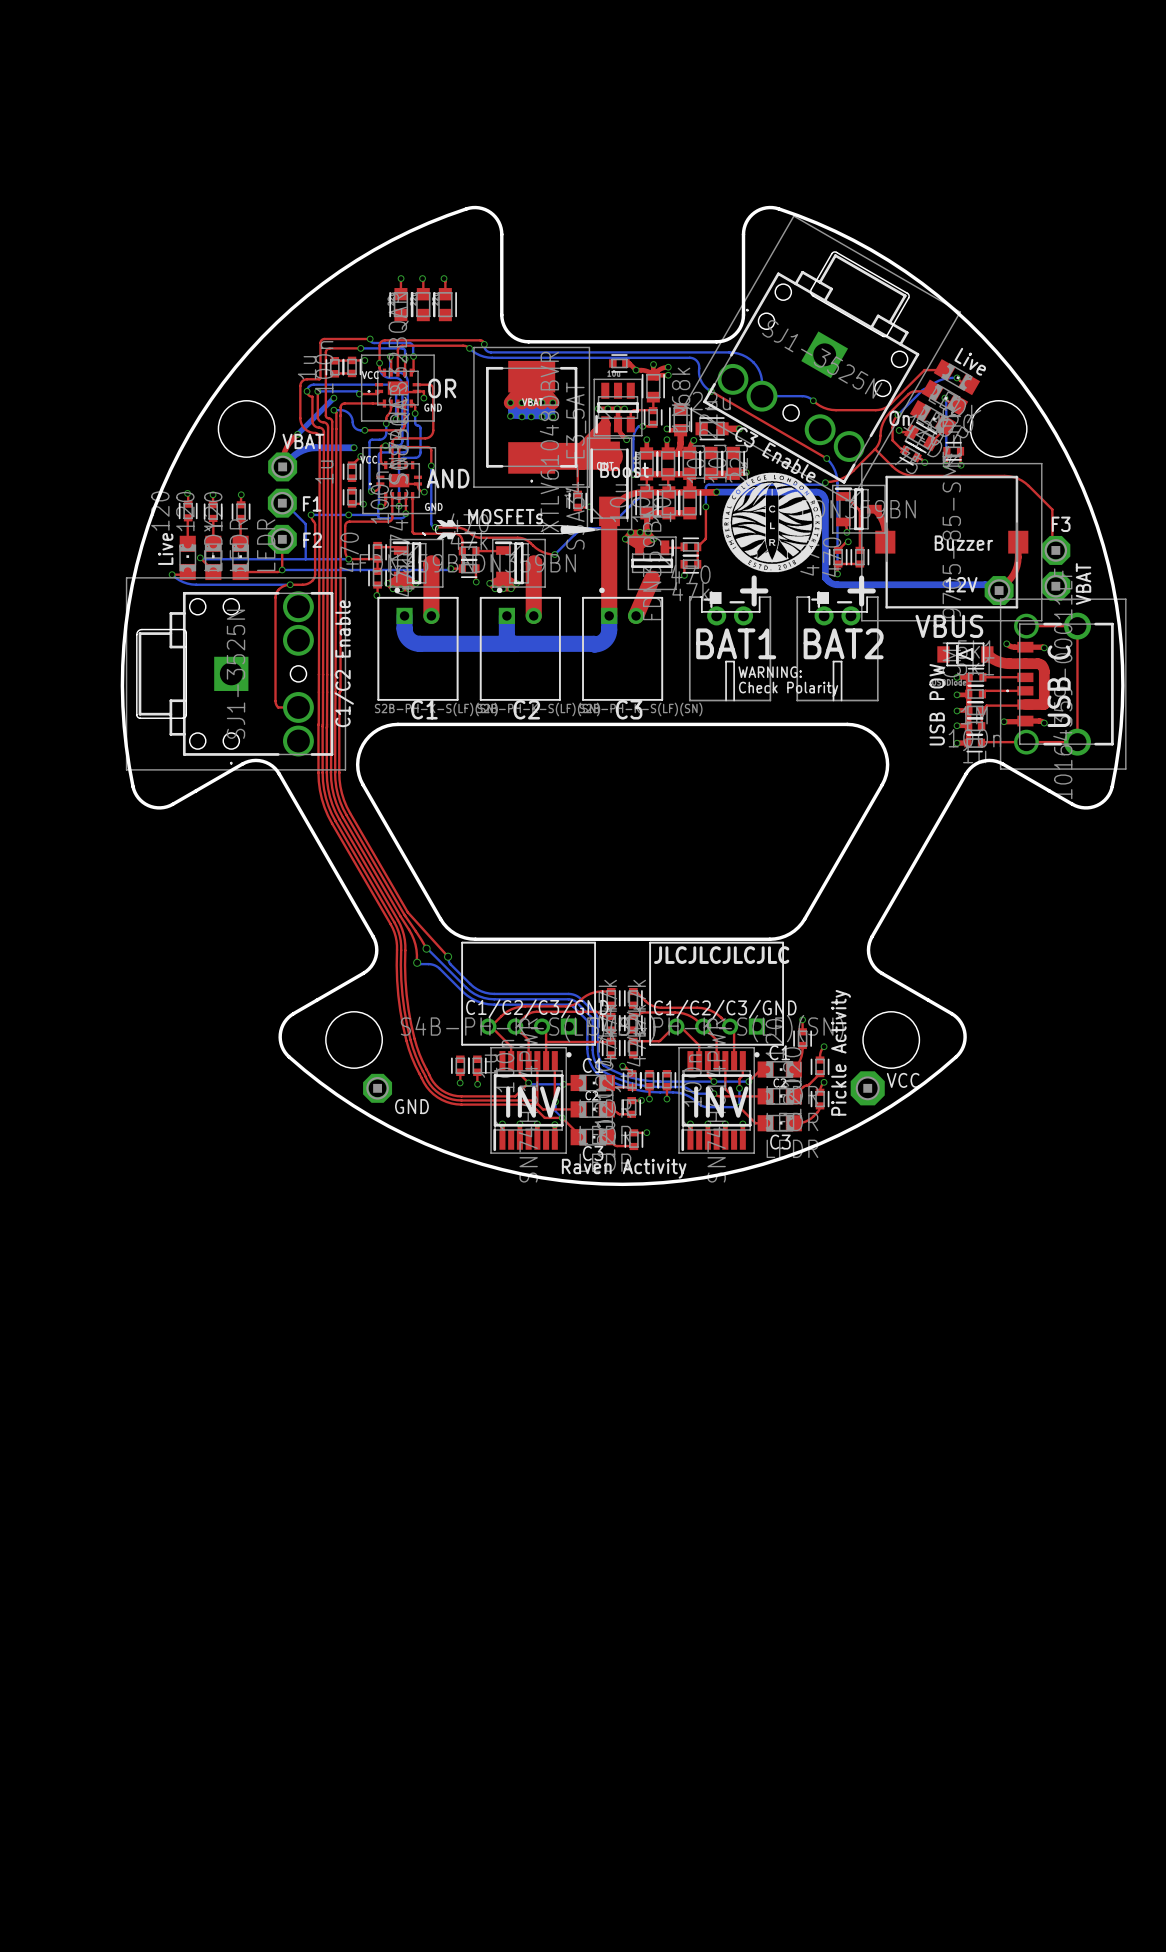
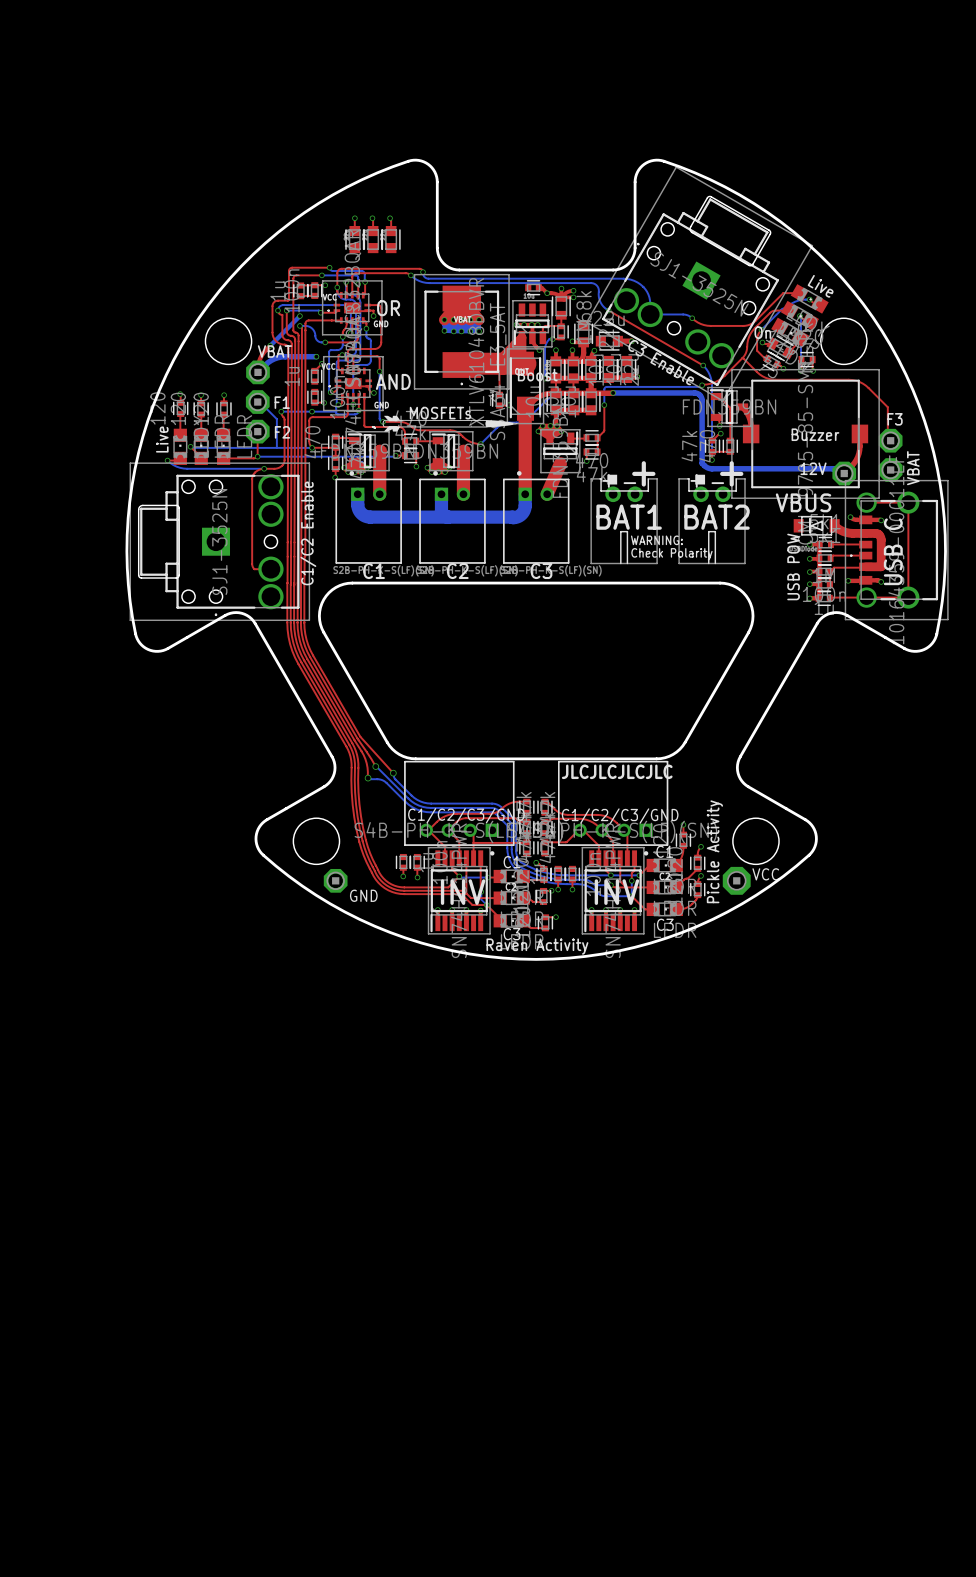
drawing: [722, 472, 822, 573] -> none

